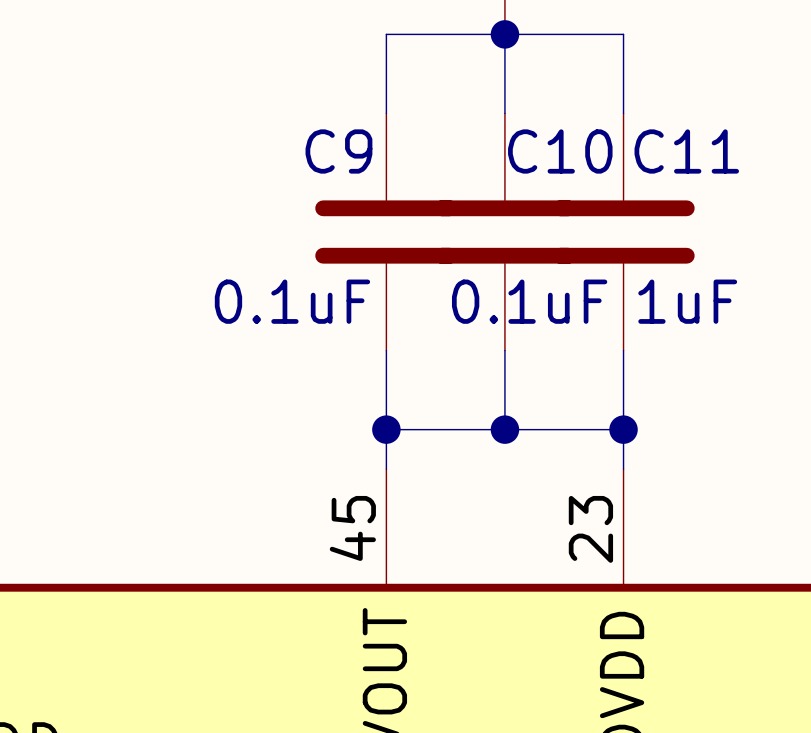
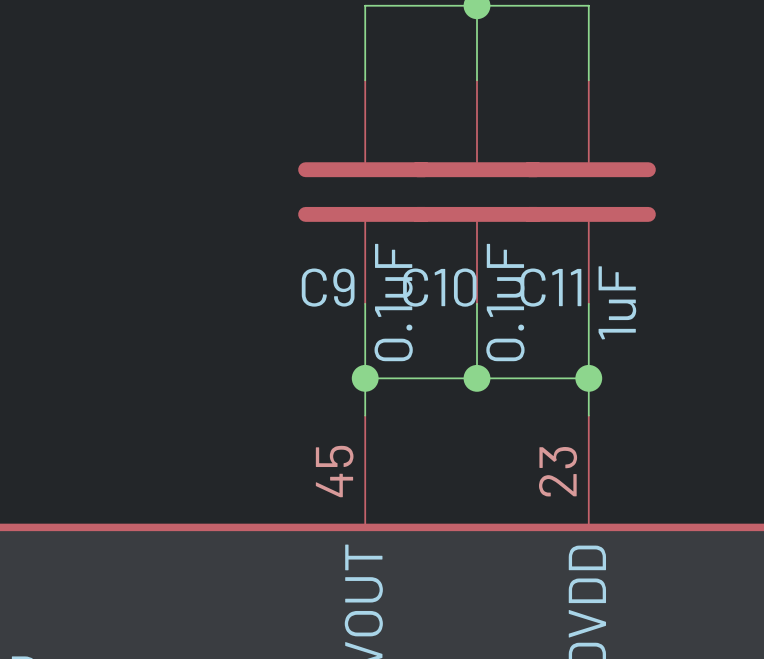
C9 name position: C9 (338, 151) -> C9 (328, 287)
C10 name position: C10 (560, 151) -> C10 (439, 287)
C11 name position: C11 (686, 151) -> C11 (550, 287)
C9 value rotation: 0° (292, 301) -> 90° counterclockwise (393, 302)
C10 value rotation: 0° (529, 301) -> 90° counterclockwise (505, 302)
C11 value rotation: 0° (687, 301) -> 90° counterclockwise (617, 302)

